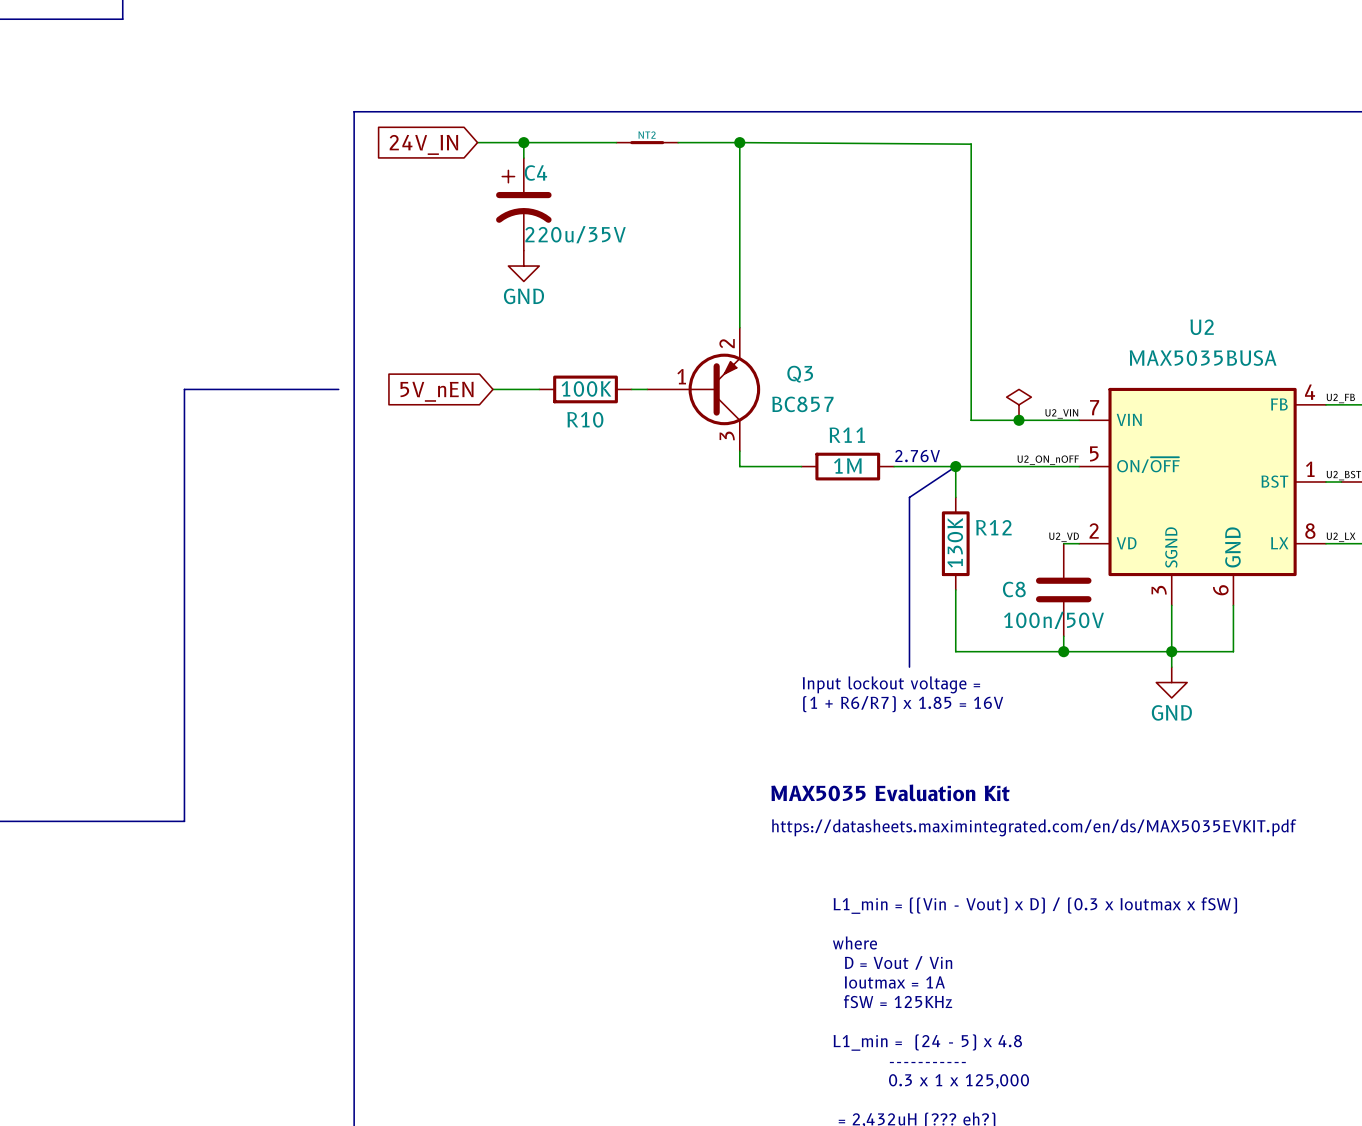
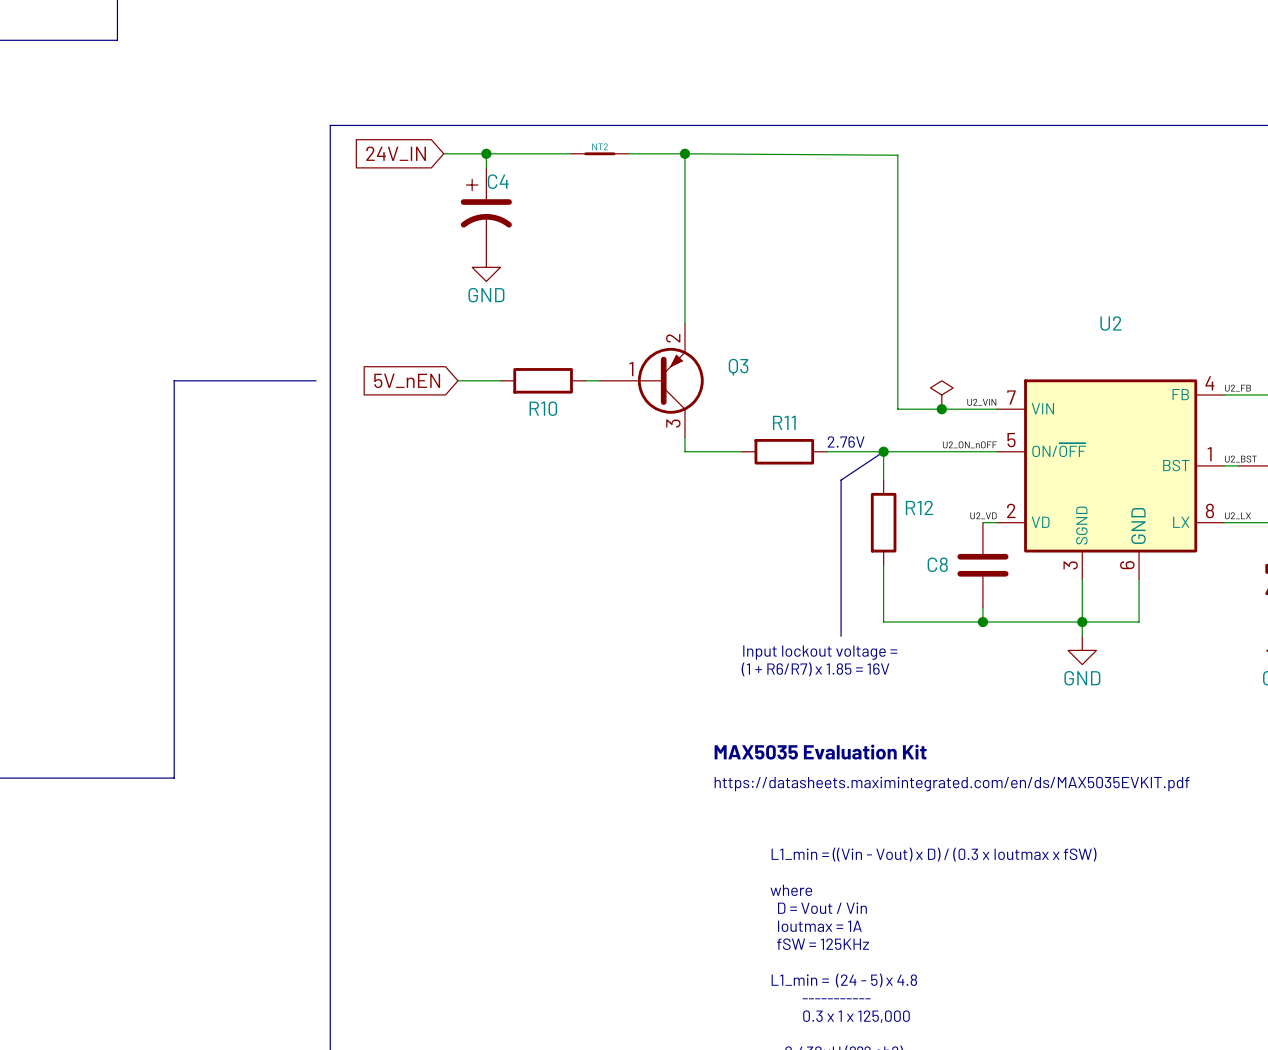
C4 value: 220u/35V (575, 234) -> none
U2 value: MAX5035BUSA (1203, 358) -> none
R10 value: 100K (586, 388) -> none
Q3 value: BC857 (802, 404) -> none
R11 value: 1M (847, 465) -> none
R12 value: 130K (955, 542) -> none
C8 value: 100n/50V (1053, 620) -> none

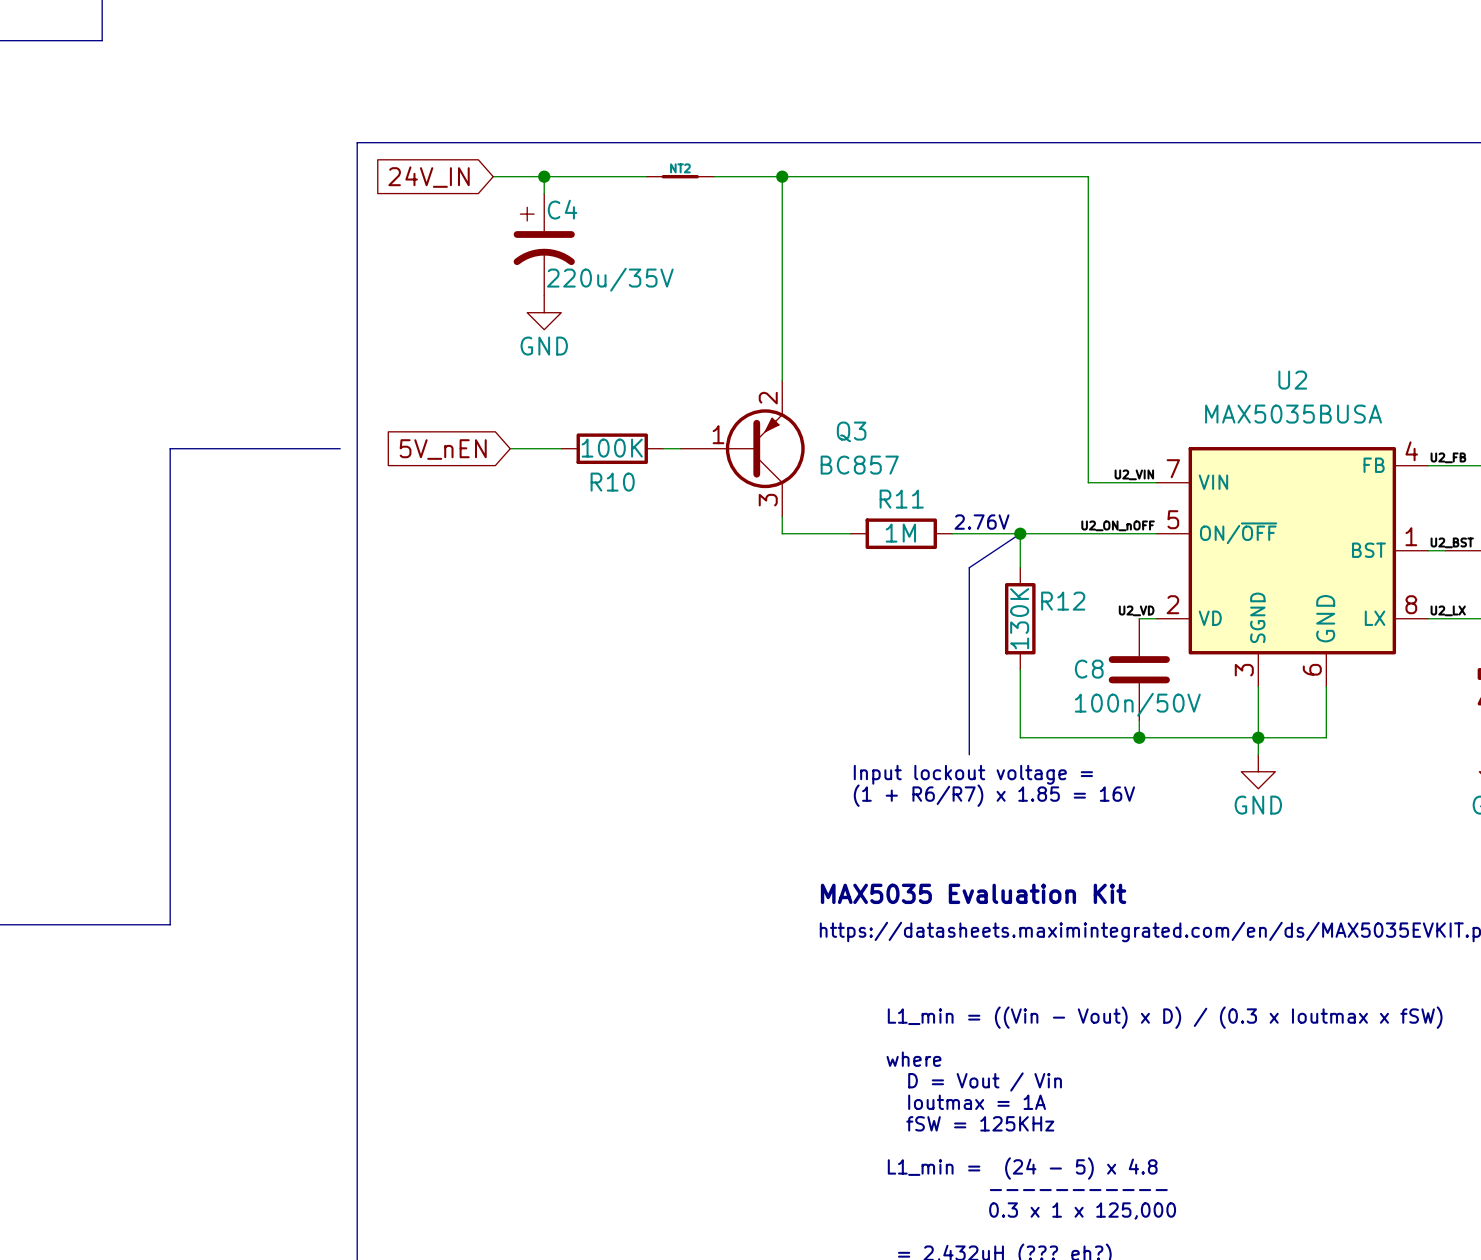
wire: (684, 153) (897, 155) (897, 409) (940, 409) -> (782, 176) (1088, 176) (1088, 482)
C4 value: none -> 220u/35V (610, 279)
U2 value: none -> MAX5035BUSA (1293, 414)
R10 value: none -> 100K (612, 448)
Q3 value: none -> BC857 (859, 465)
power symbol: (941, 395) -> none
junction: (941, 409) -> none
R11 value: none -> 1M (900, 533)
R12 value: none -> 130K (1019, 618)
C8 value: none -> 100n/50V (1137, 704)

